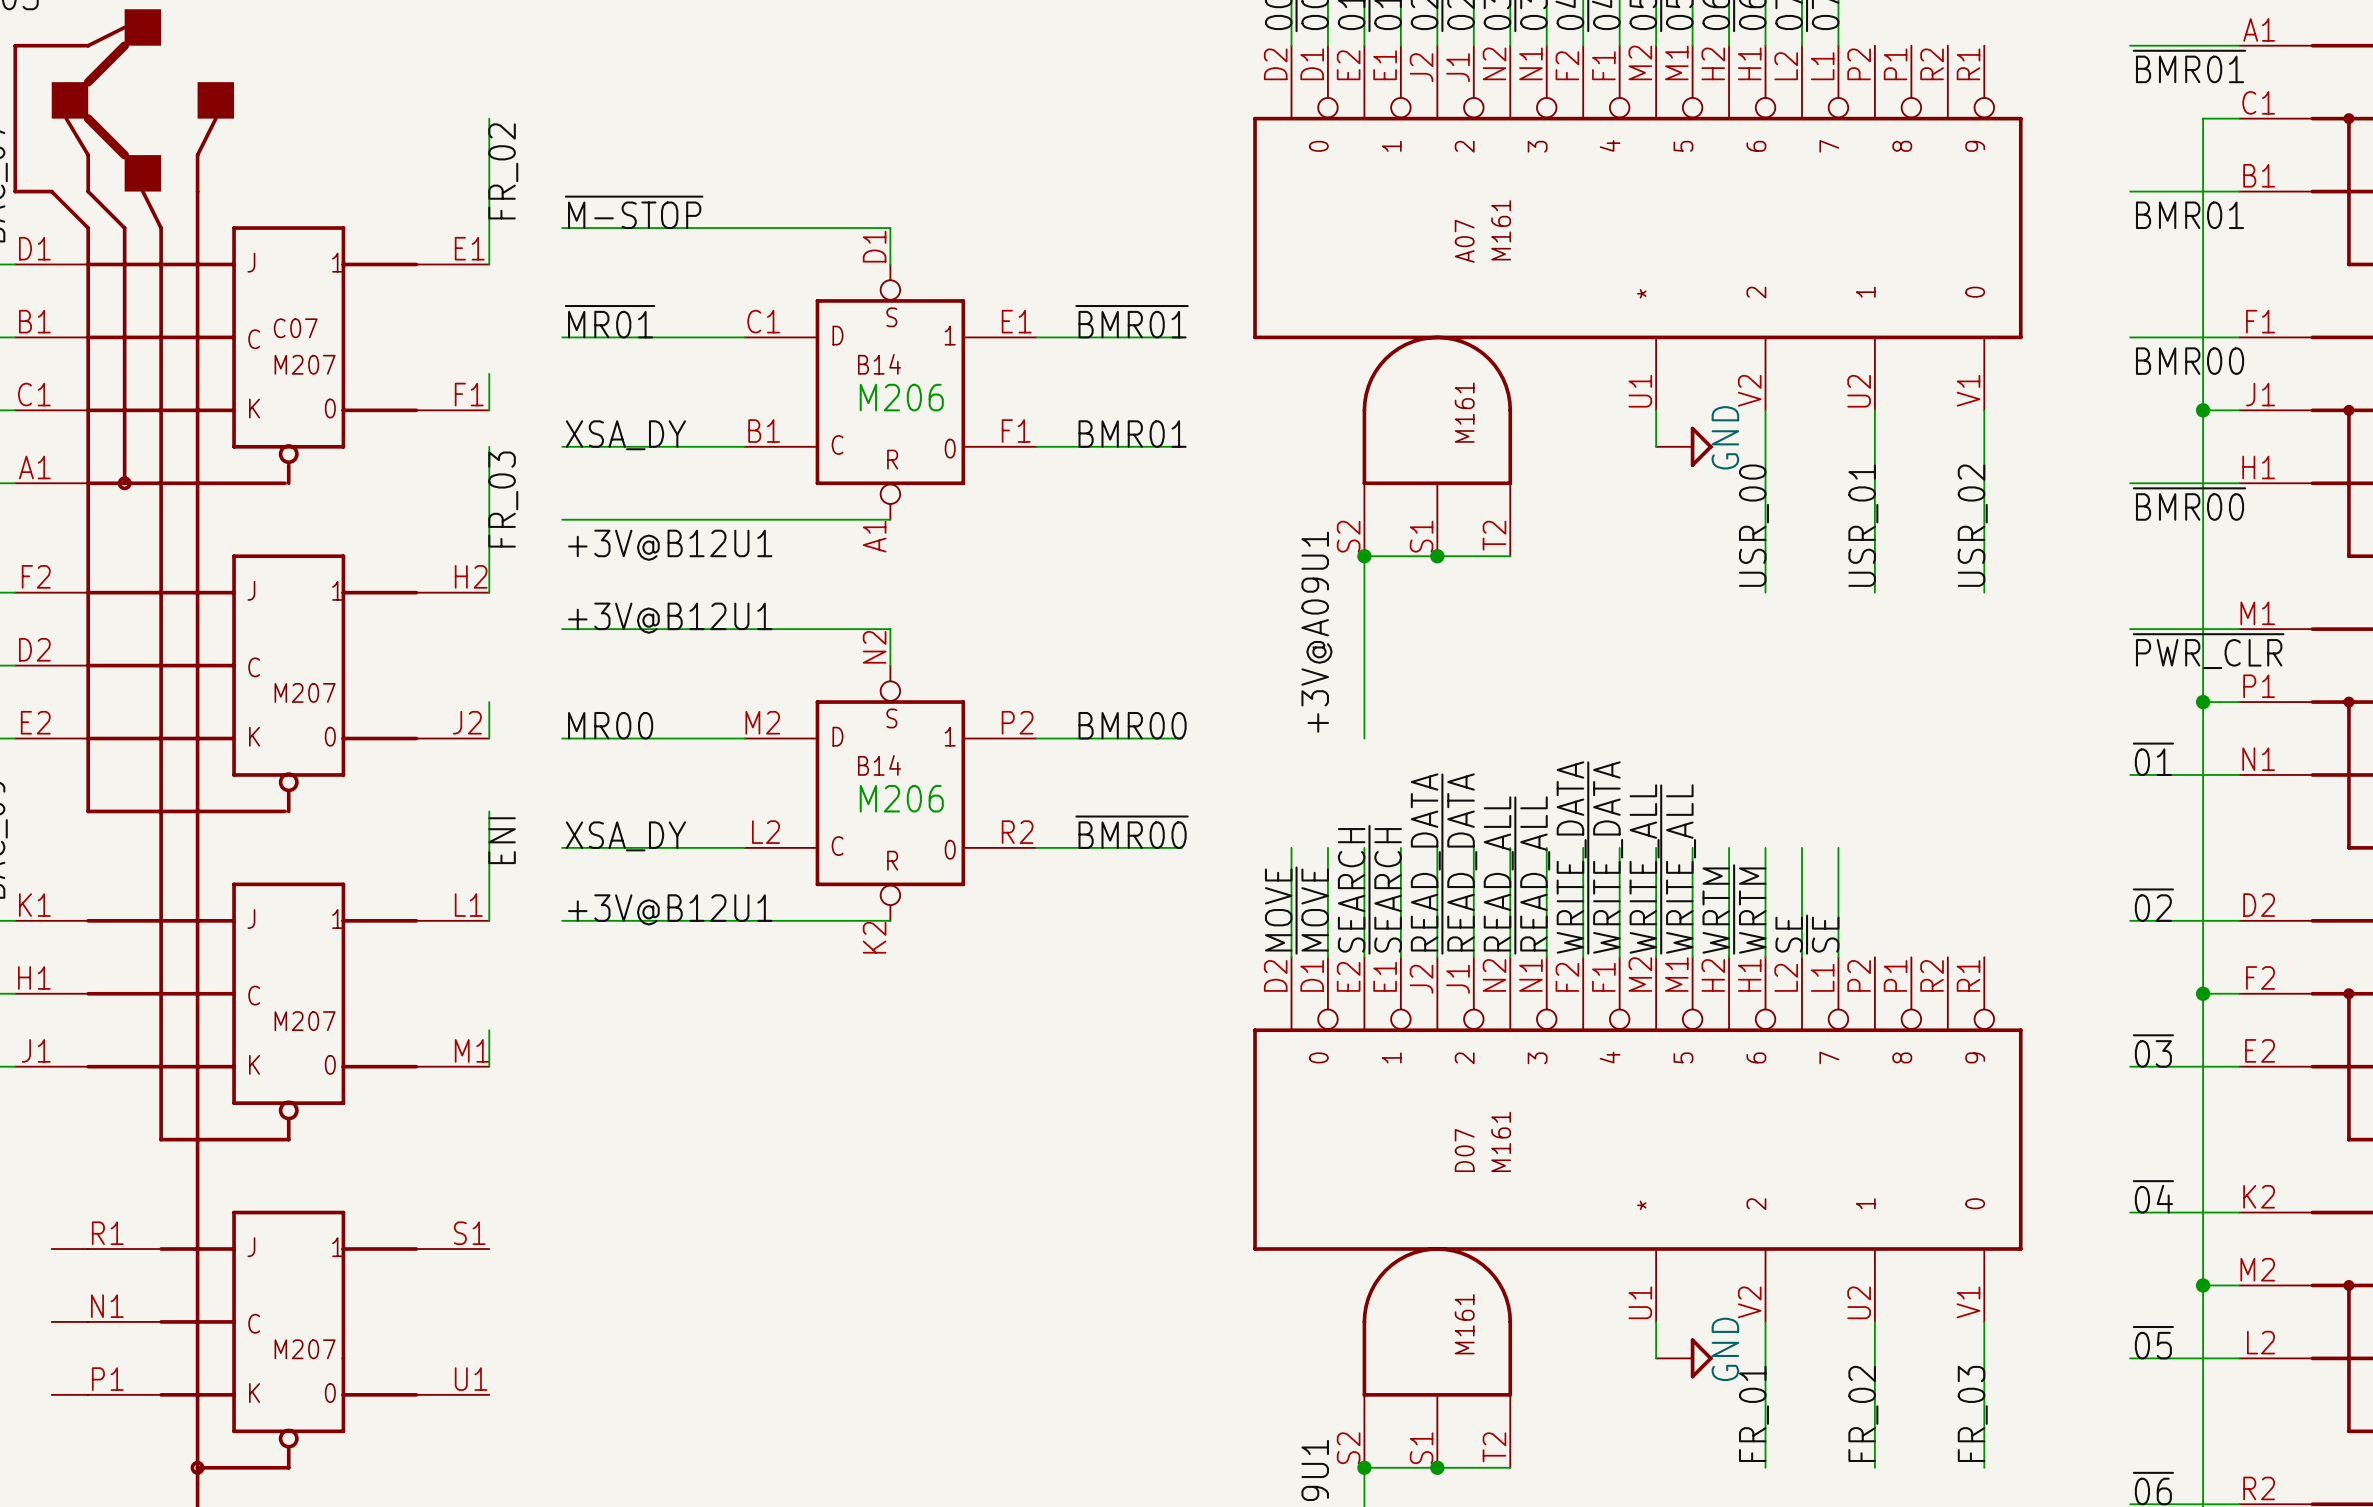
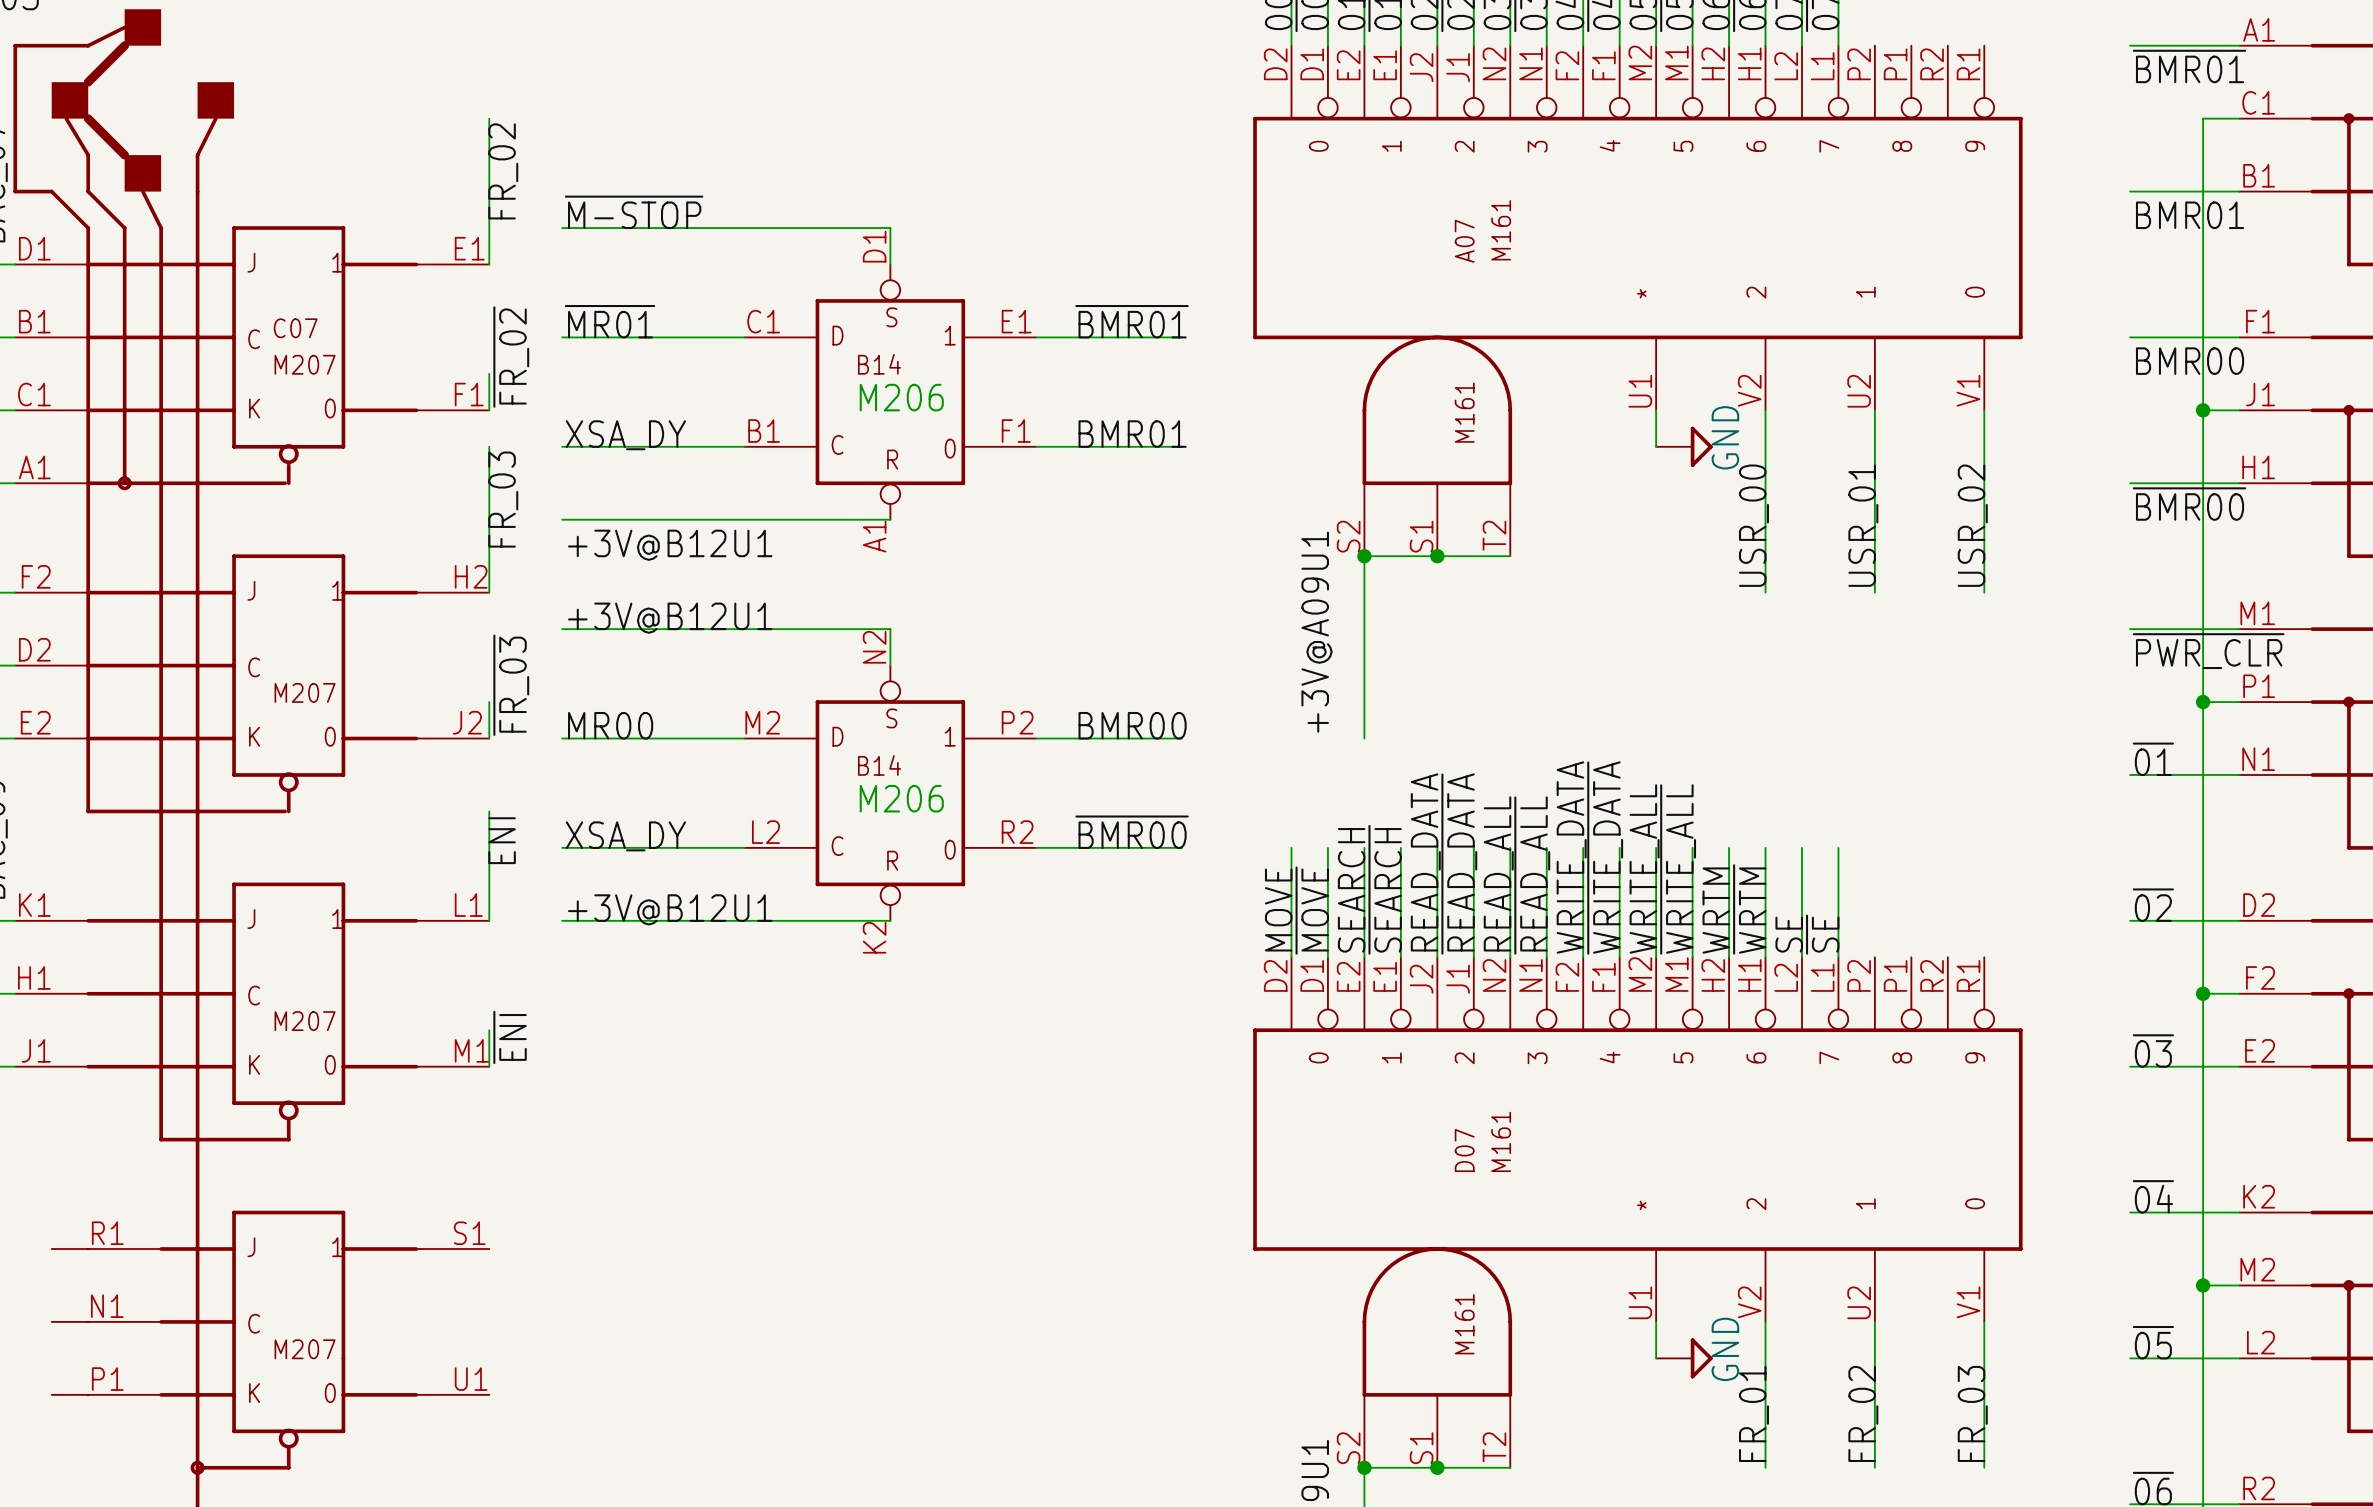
label: none -> ~{FR_02} (511, 357)
label: none -> ~{FR_03} (511, 685)
label: none -> ~{ENI} (510, 1037)

